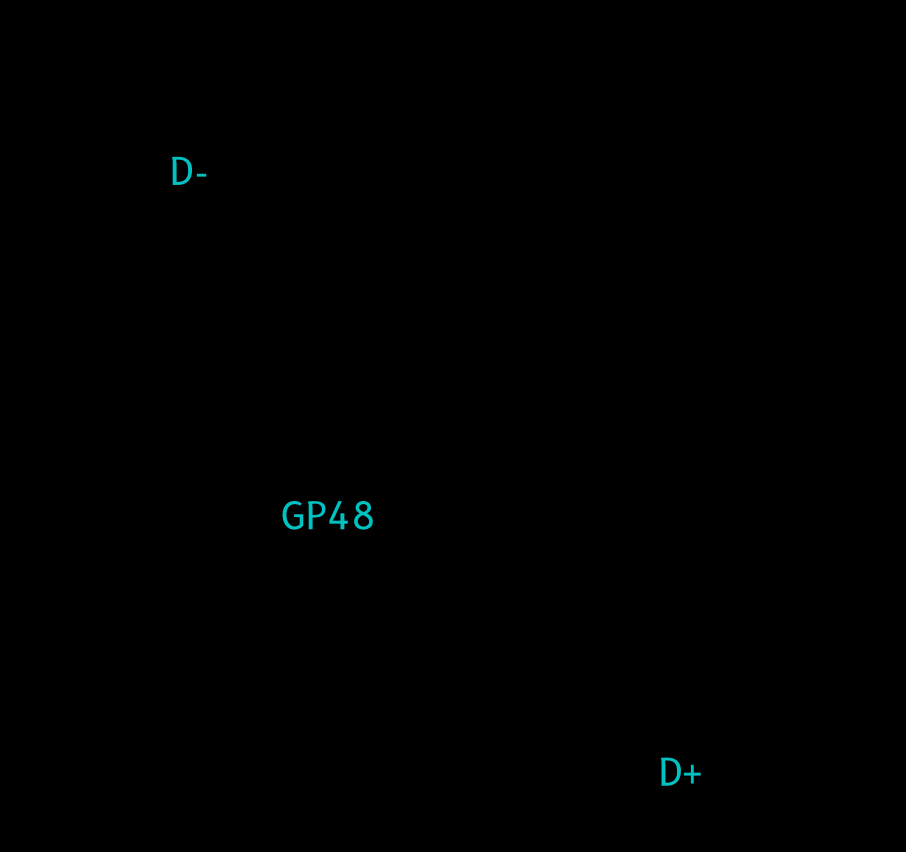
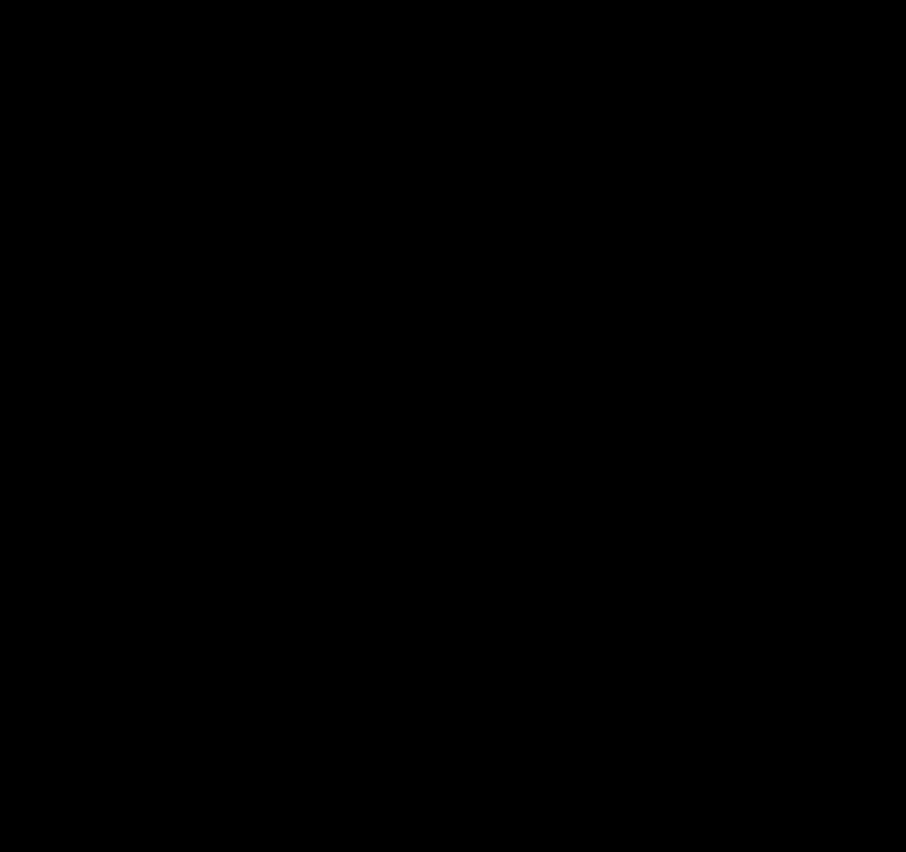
text: D- (189, 170) -> none
text: GP48 (327, 515) -> none
text: D+ (680, 771) -> none

